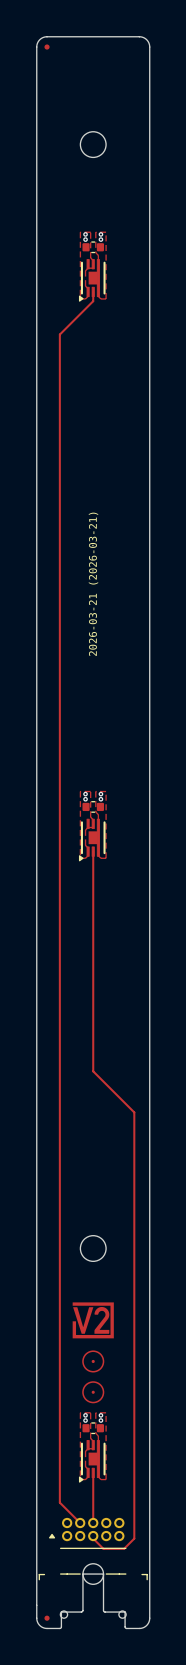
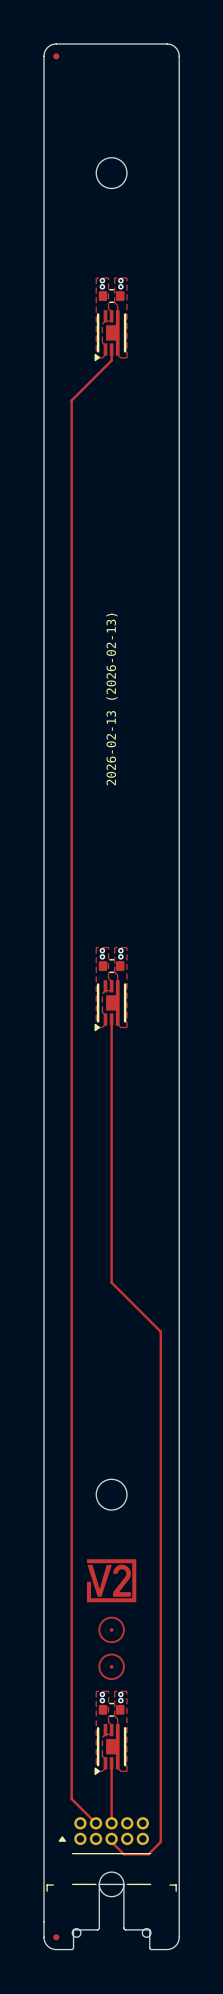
drawing shape: [88, 512, 99, 656] -> [106, 613, 118, 786]

